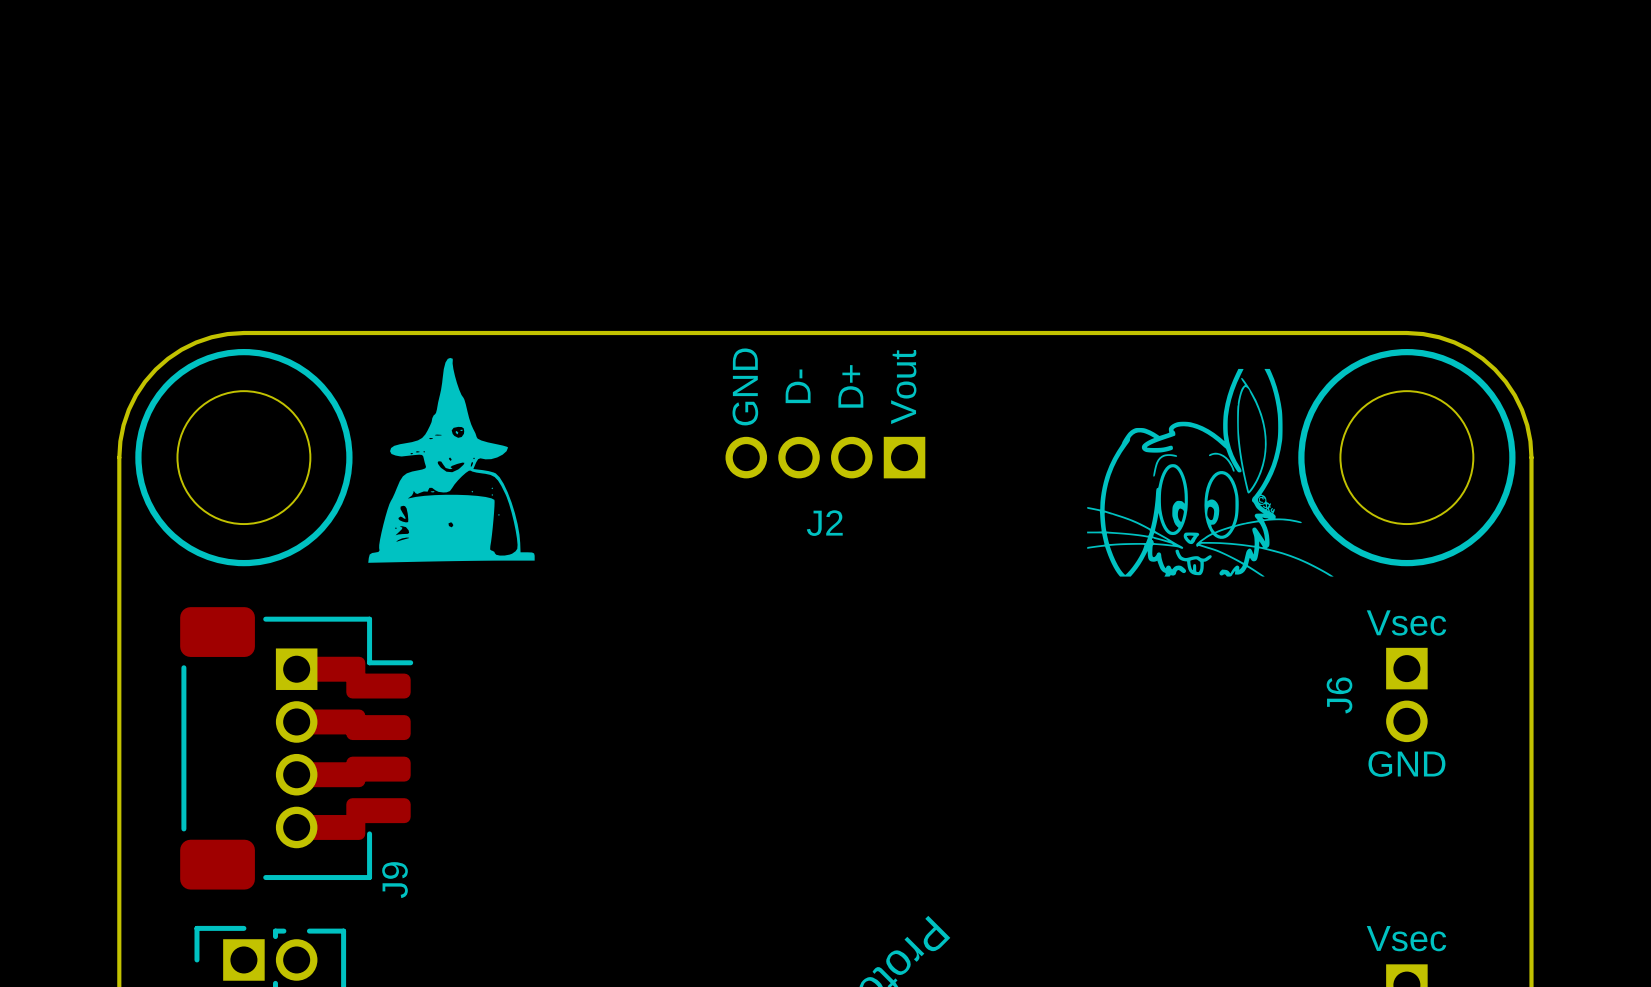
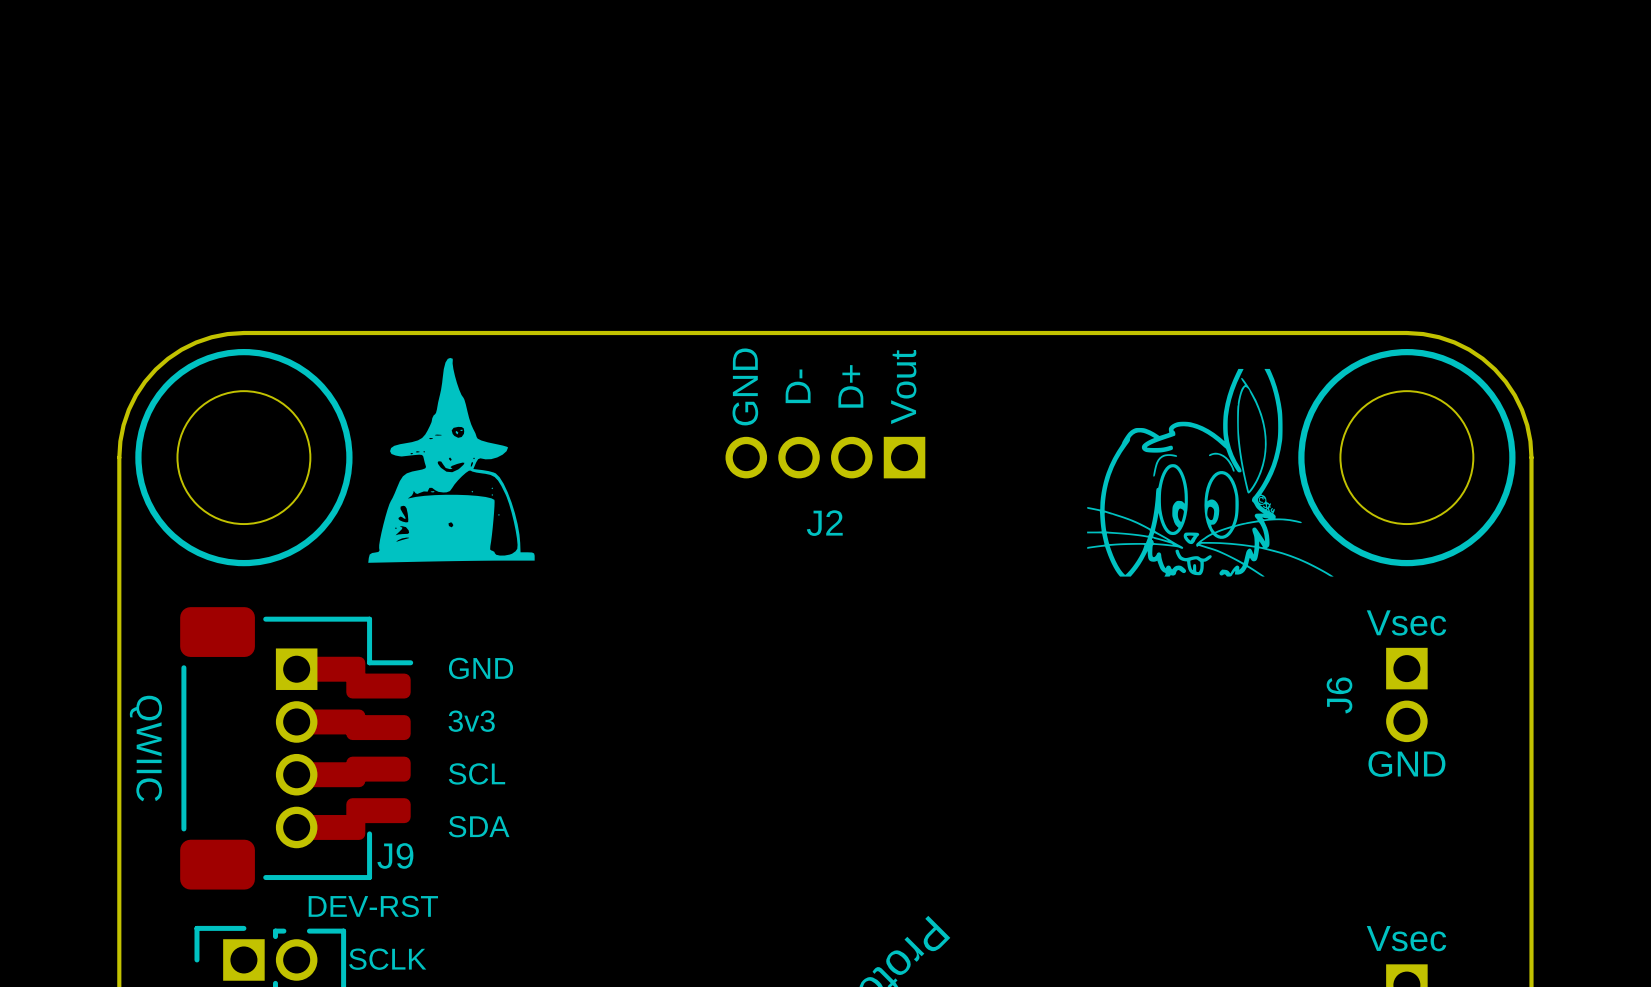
text: none -> GND (481, 668)
text: none -> 3v3 (471, 721)
text: none -> QWIIC (145, 748)
text: none -> SCL (476, 773)
text: none -> SDA (479, 826)
J9 name rotation: 0° (395, 880) -> 90° clockwise (395, 855)
text: none -> DEV-RST (373, 906)
text: none -> SCLK (387, 959)

